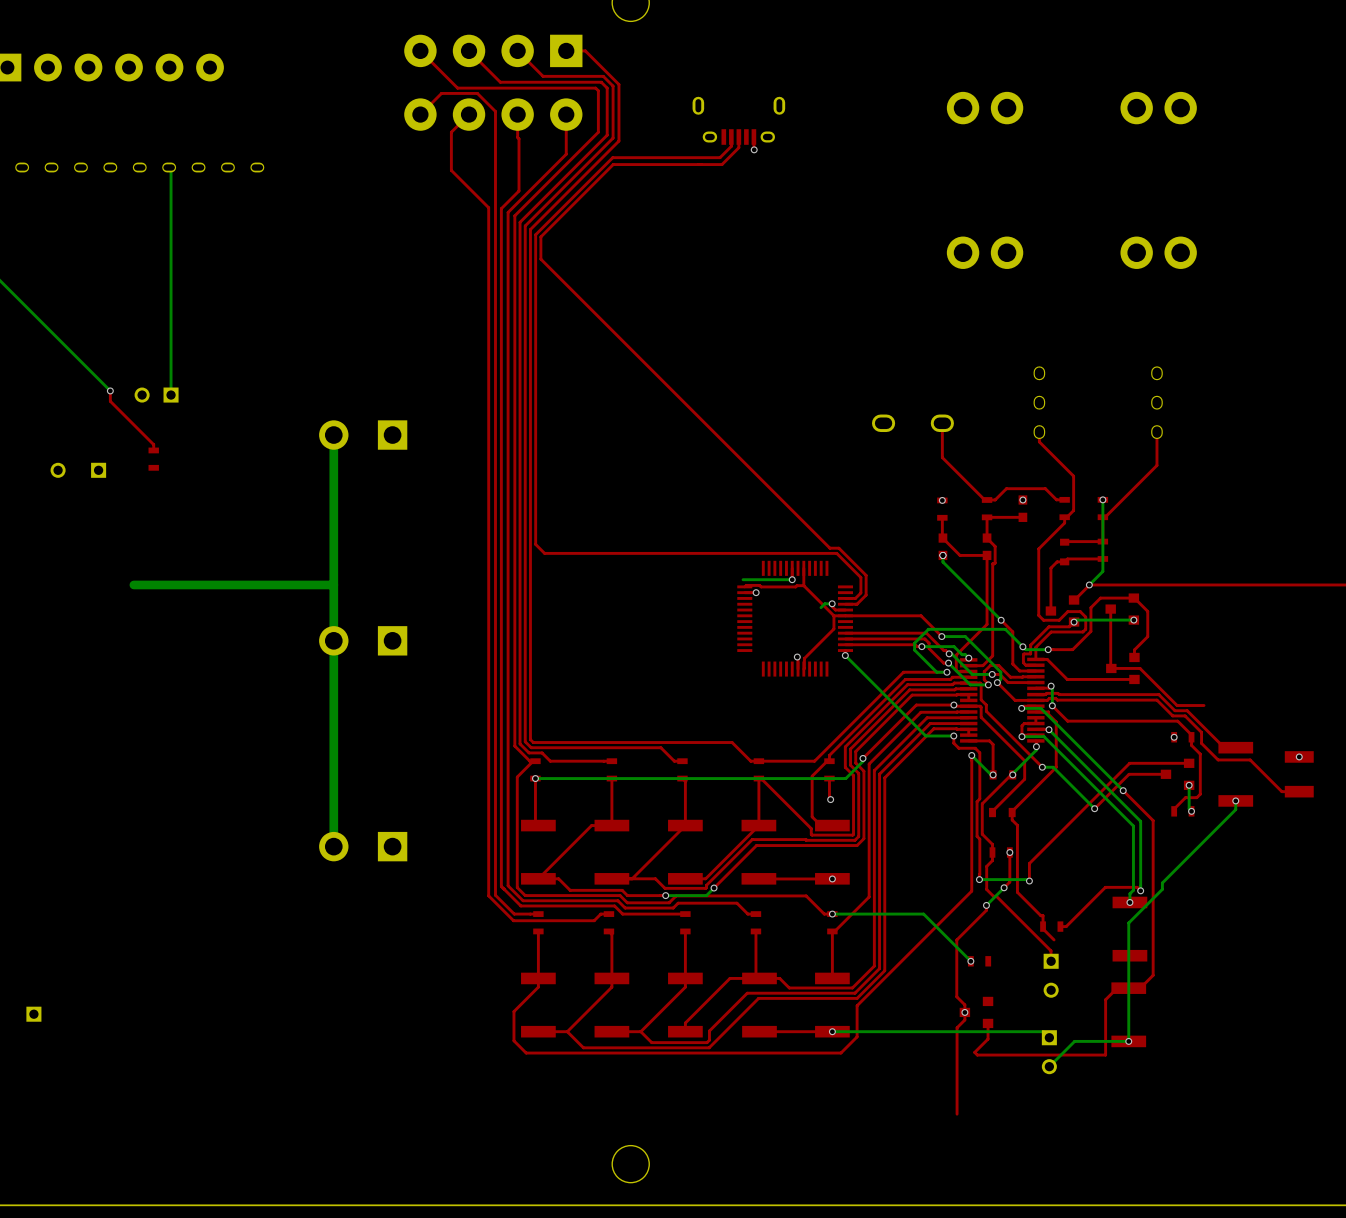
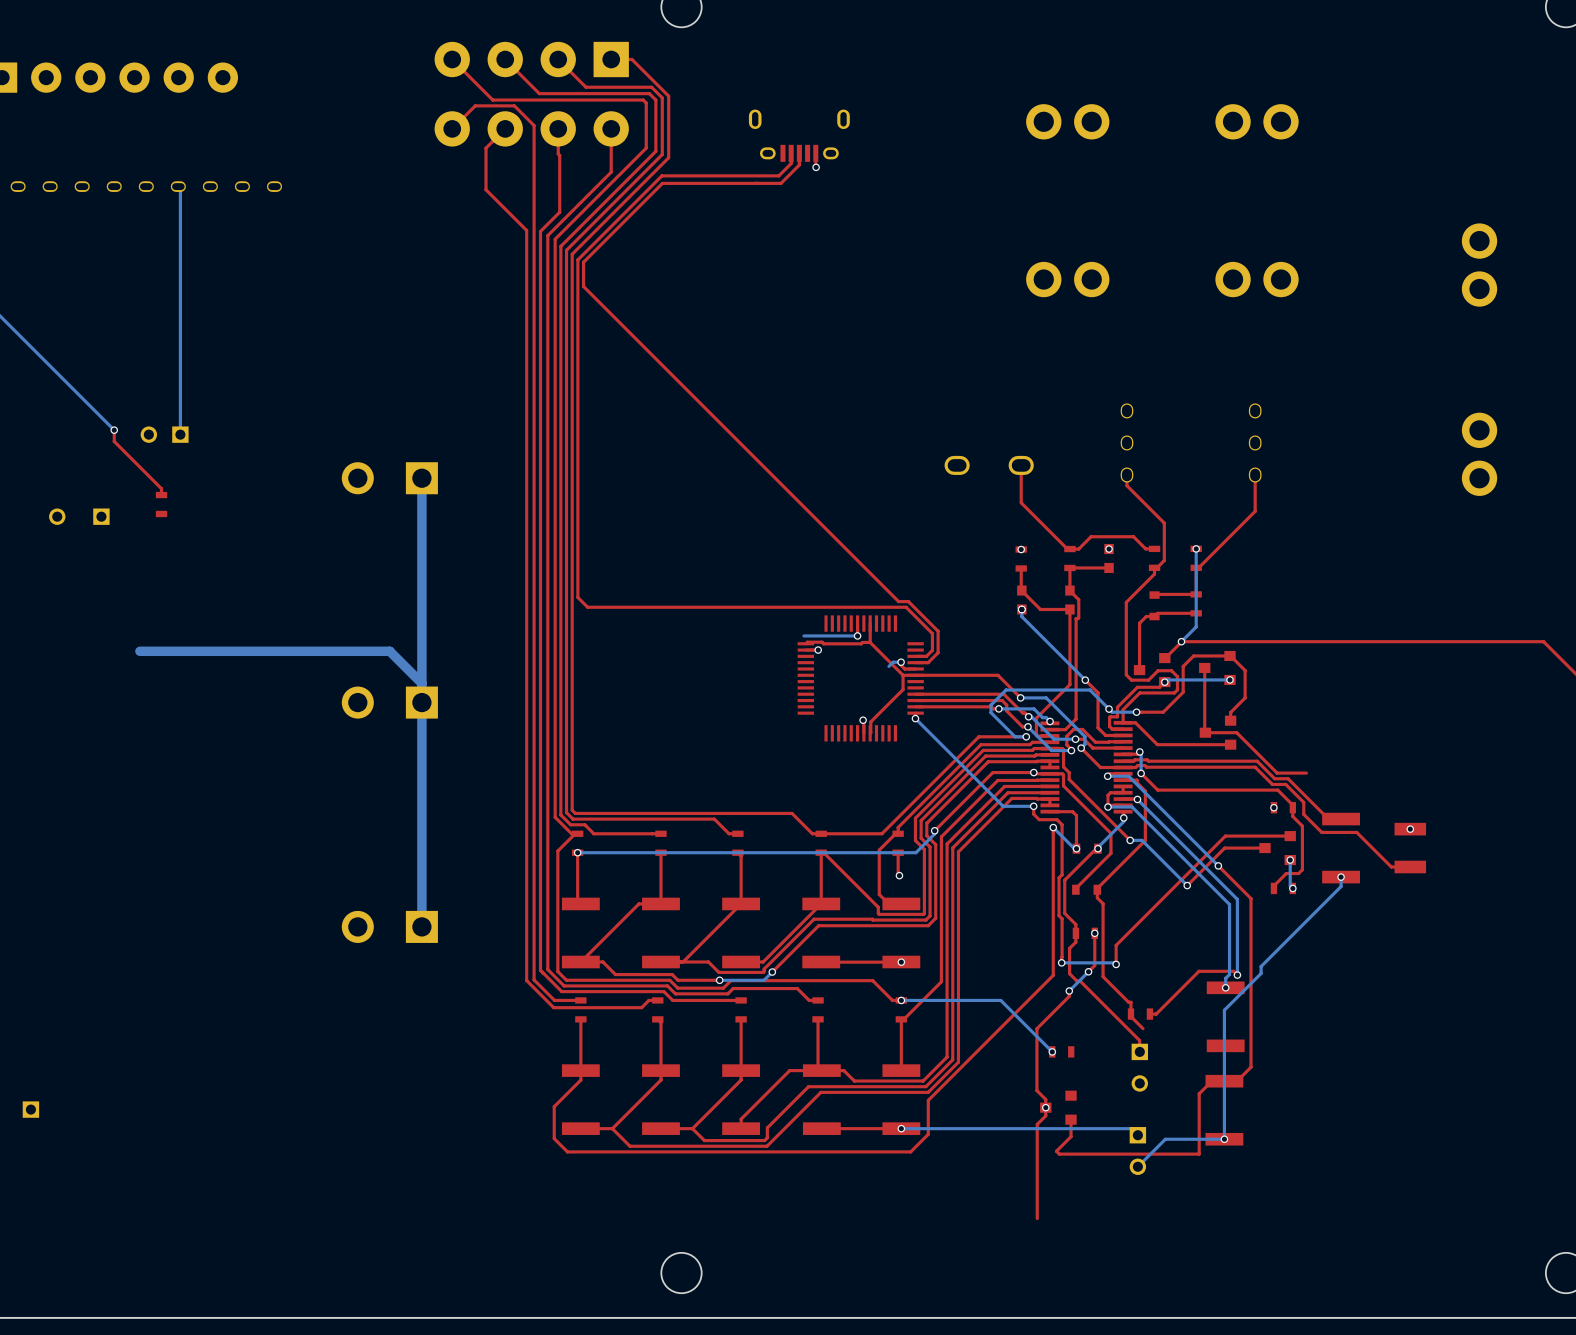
bottom track: (333, 435) (333, 846) -> (421, 478) (421, 926)
bottom track: (333, 584) (133, 584) -> none
bottom track: none -> (139, 651) (389, 651) (421, 683) (421, 702)

